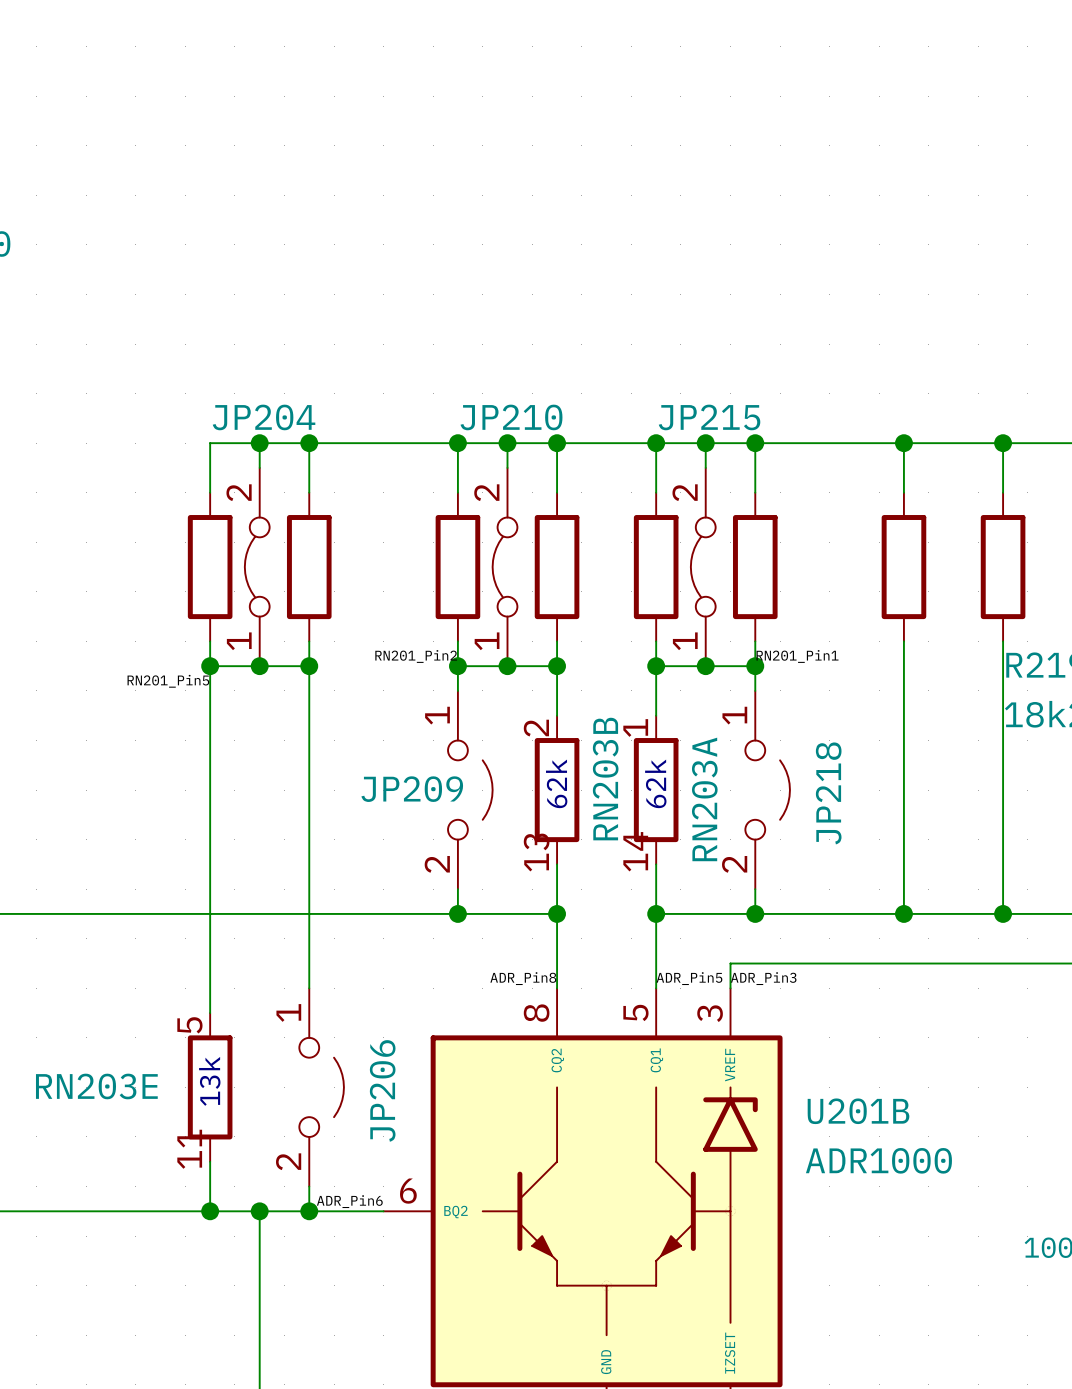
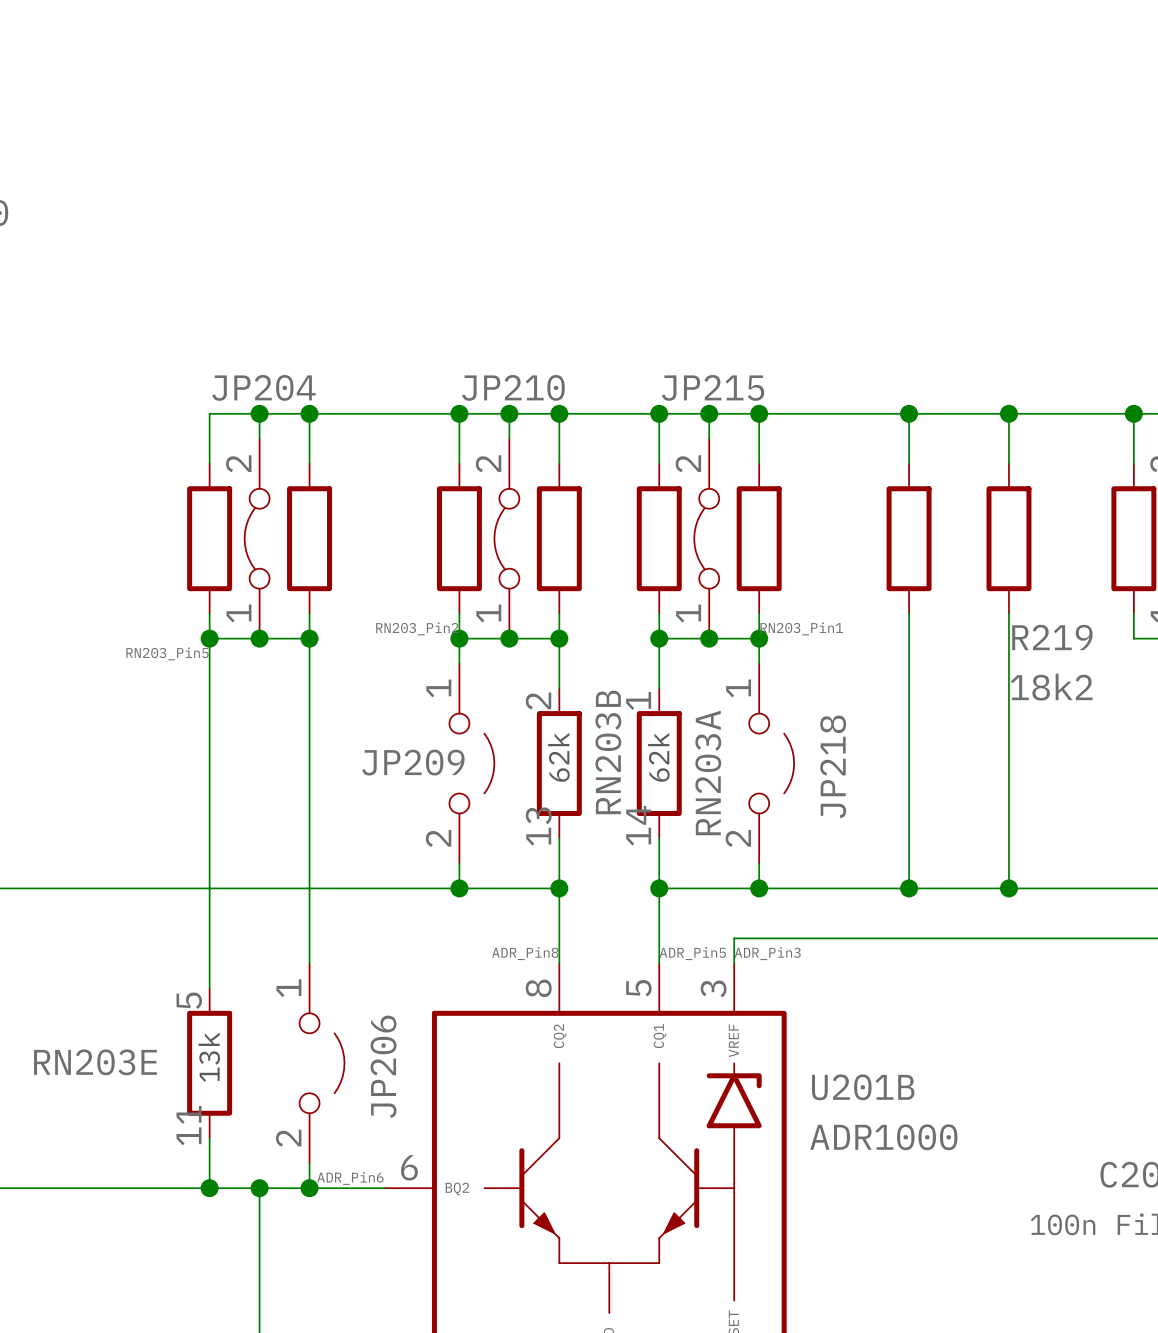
label: RN201_Pin2 (416, 656) -> RN203_Pin2 (417, 628)
label: RN201_Pin1 (797, 656) -> RN203_Pin1 (801, 628)
label: RN201_Pin5 (168, 681) -> RN203_Pin5 (167, 653)

